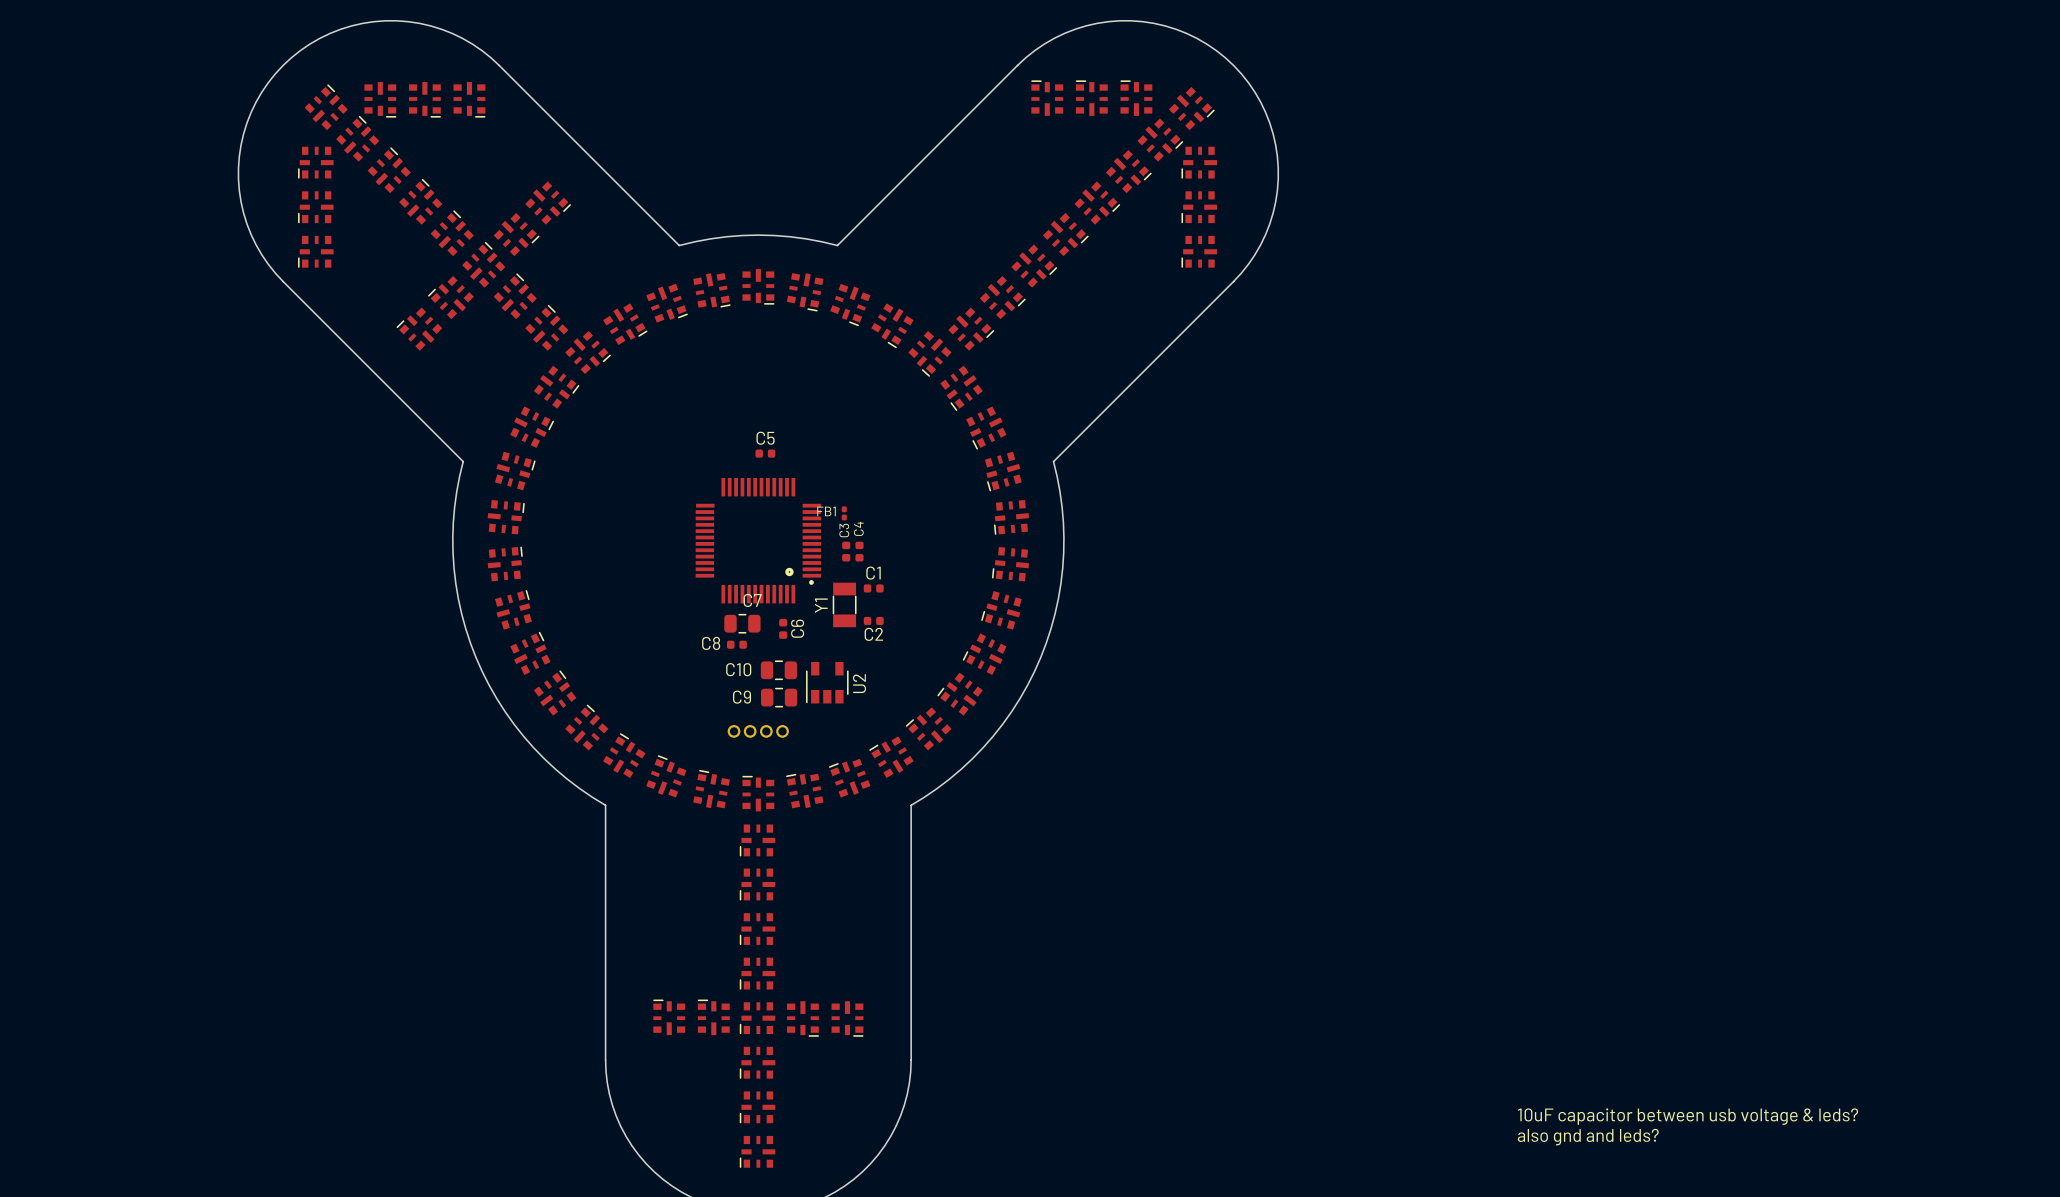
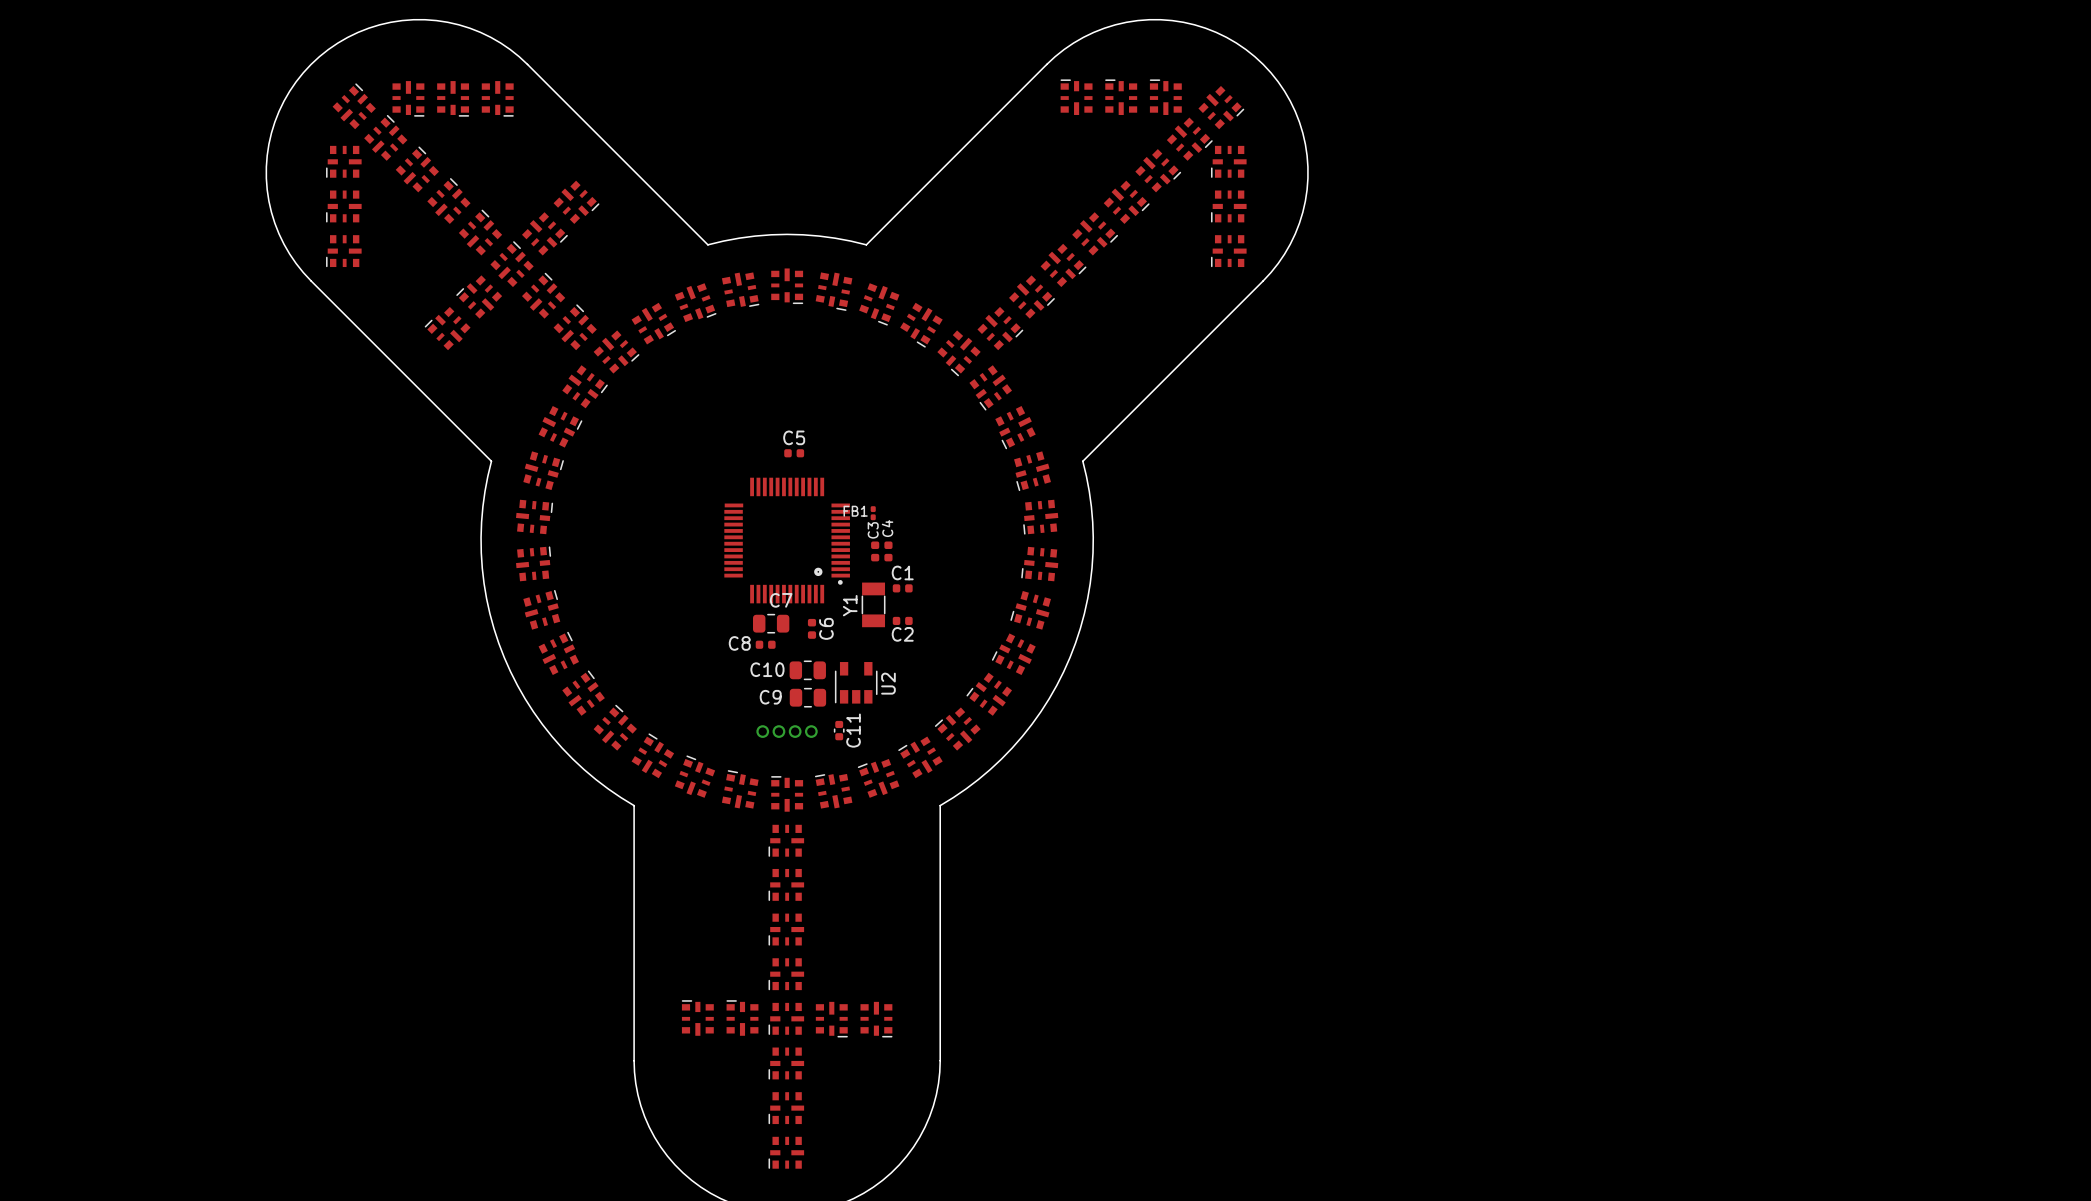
C11: none -> (839, 730)
text: 10uF capacitor between usb voltage & leds? (1688, 1116) -> none
text: also gnd and leds? (1588, 1137) -> none

